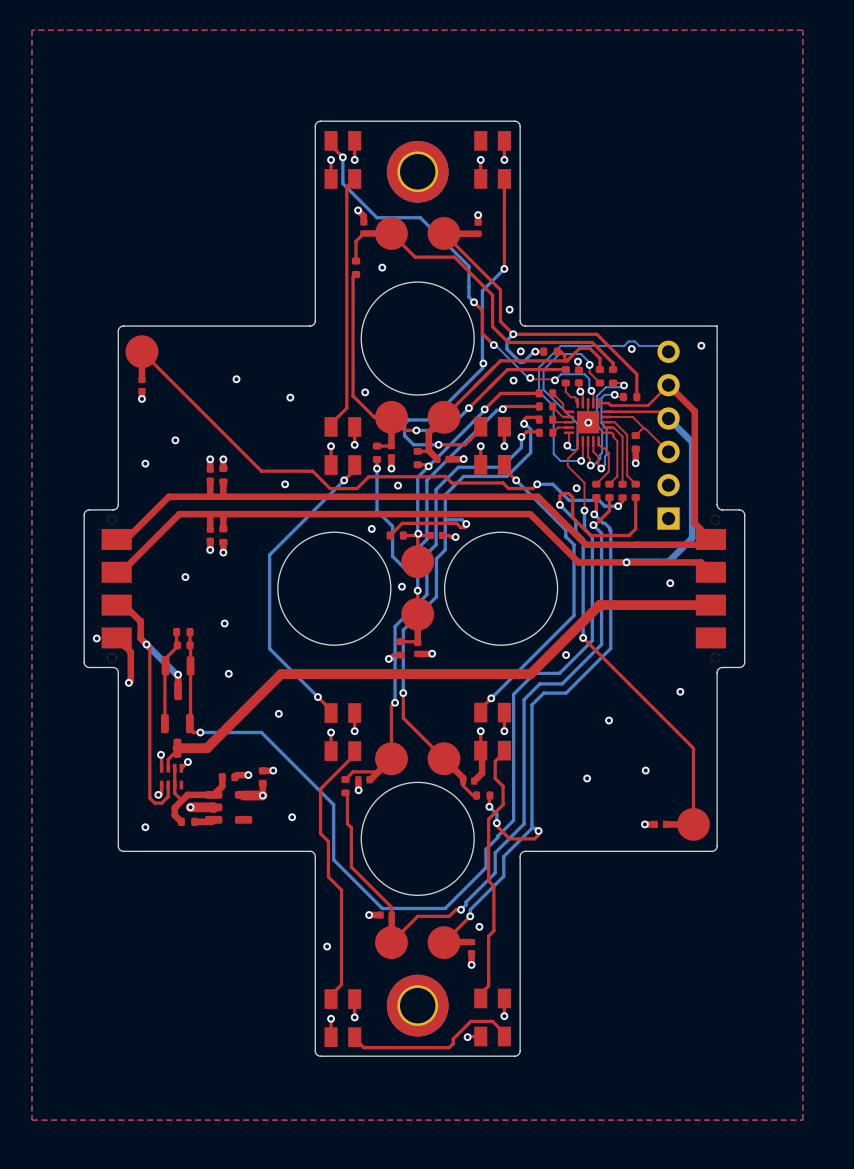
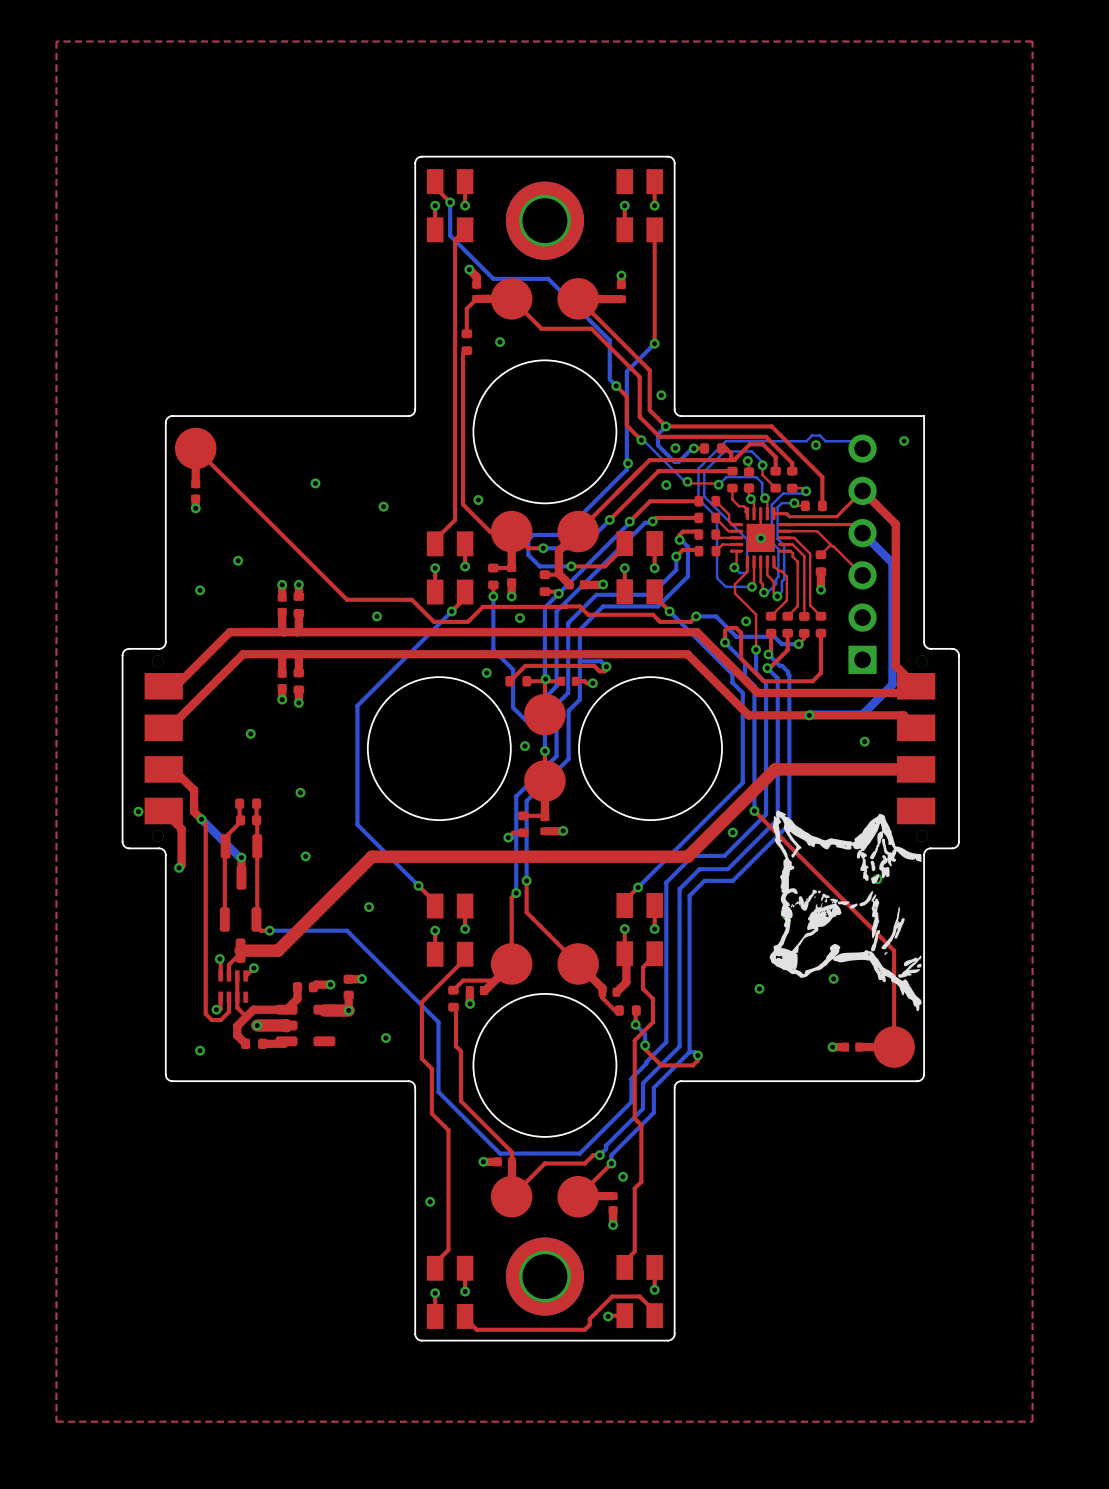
drawing: none -> [769, 810, 922, 1011]

